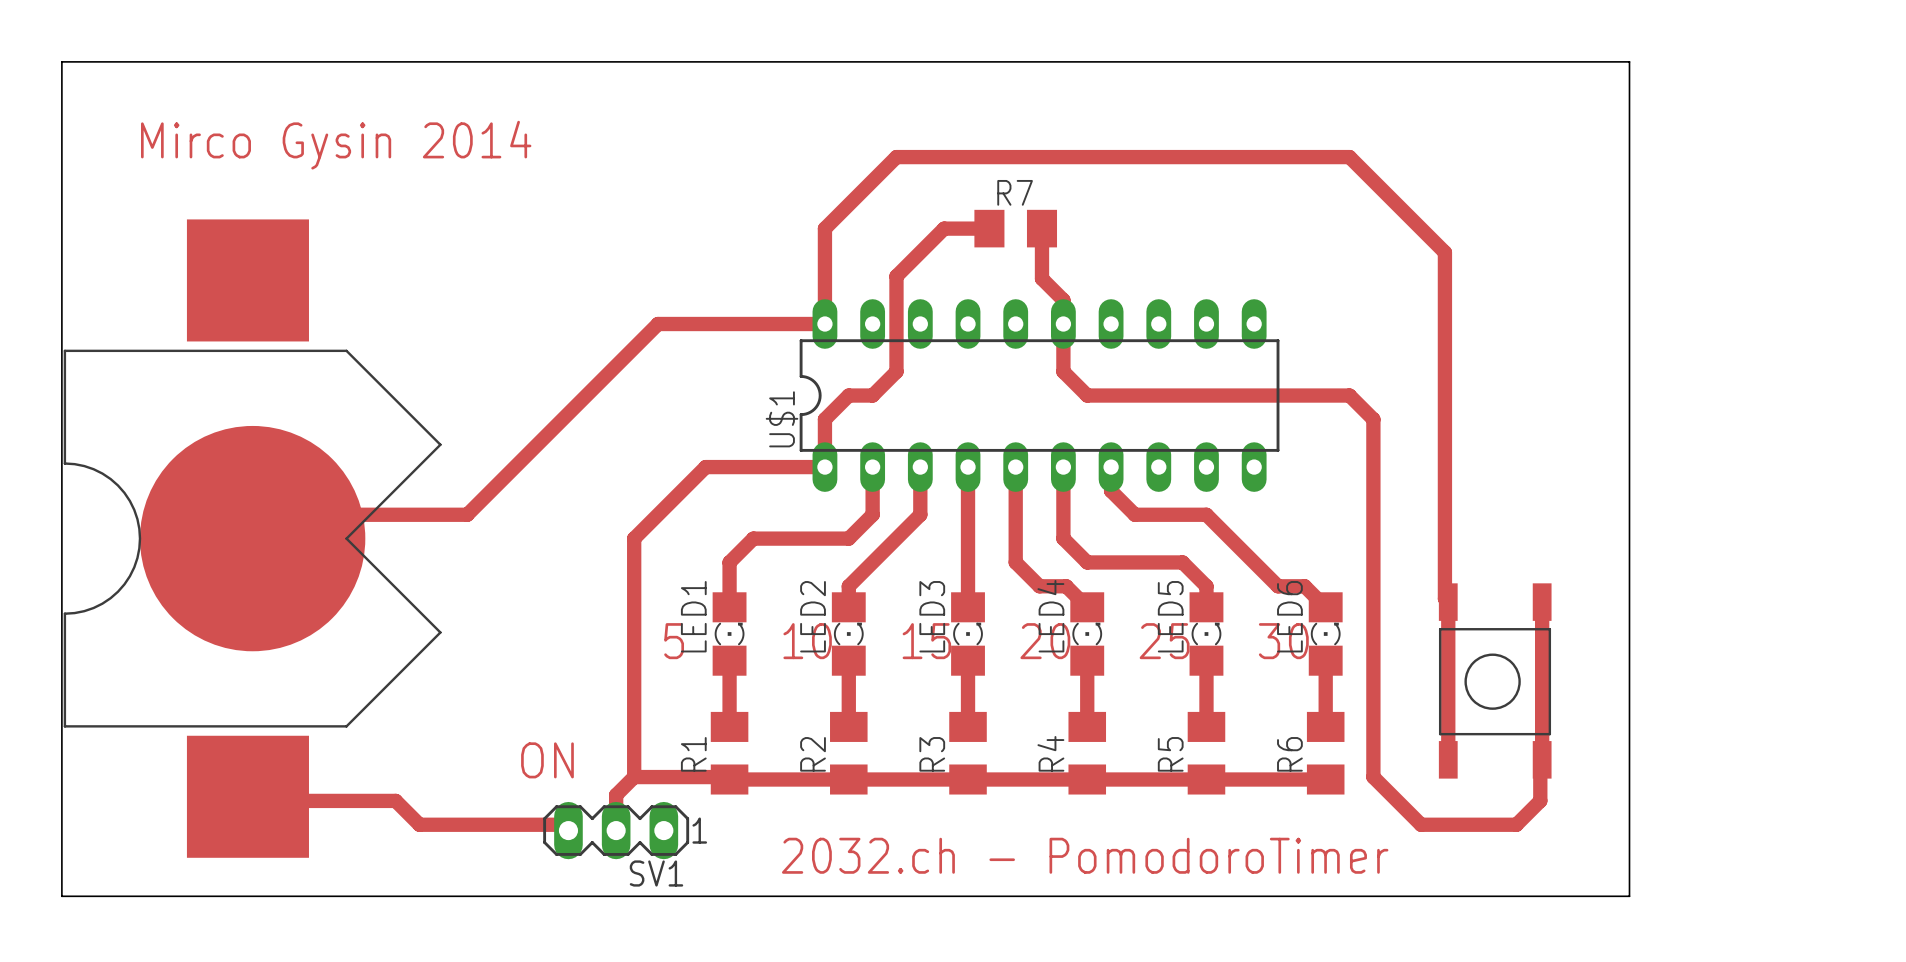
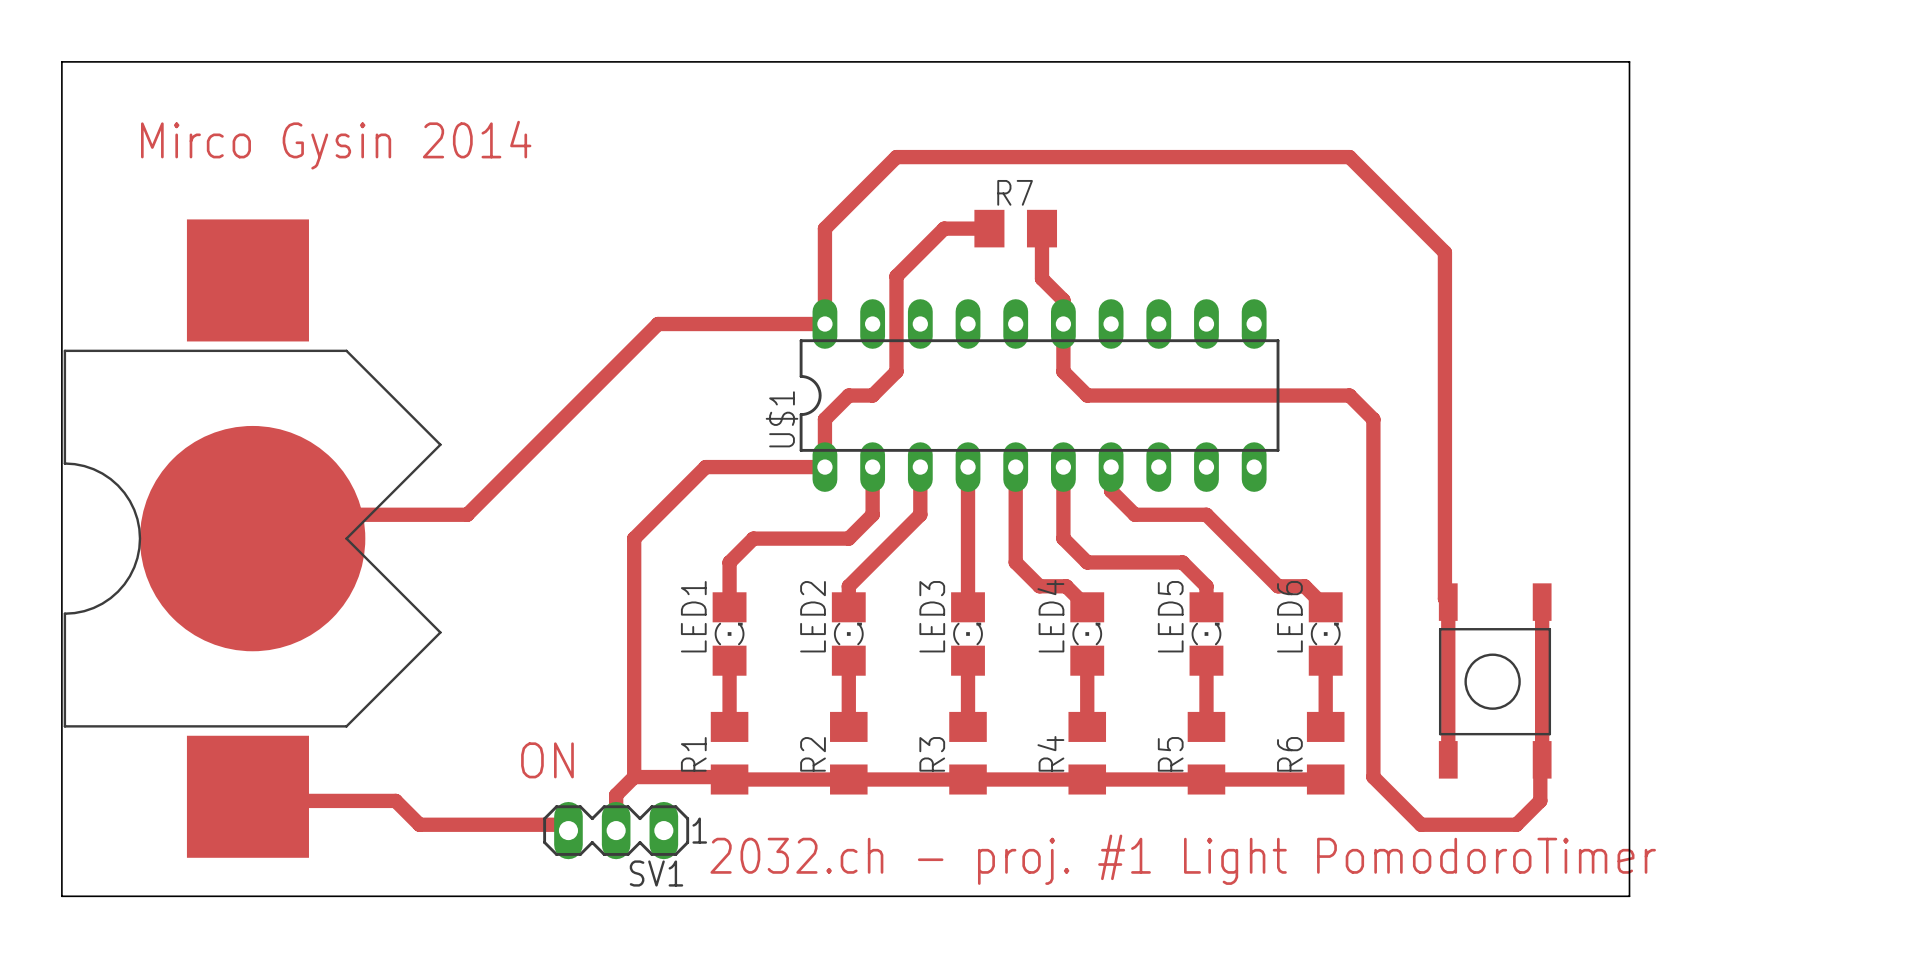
text: 5 (674, 641) -> none
text: 10 (807, 641) -> none
text: 15 (926, 641) -> none
text: 20 (1045, 641) -> none
text: 25 (1164, 641) -> none
text: 30 (1283, 641) -> none
text: 2032.ch - PomodoroTimer (1085, 855) -> 2032.ch - proj. #1 Light PomodoroTimer (1183, 859)

